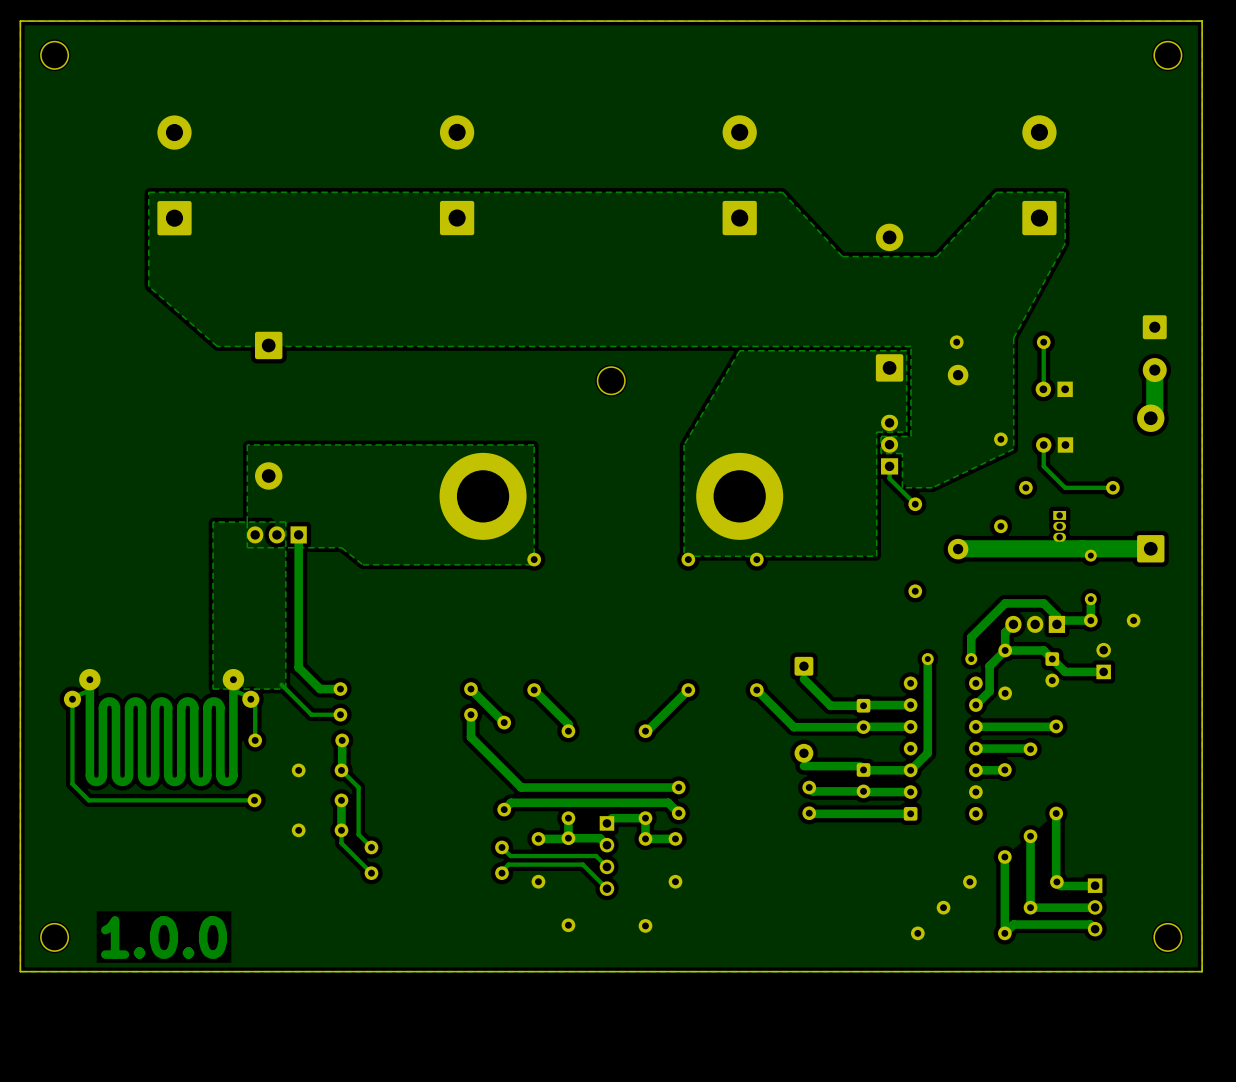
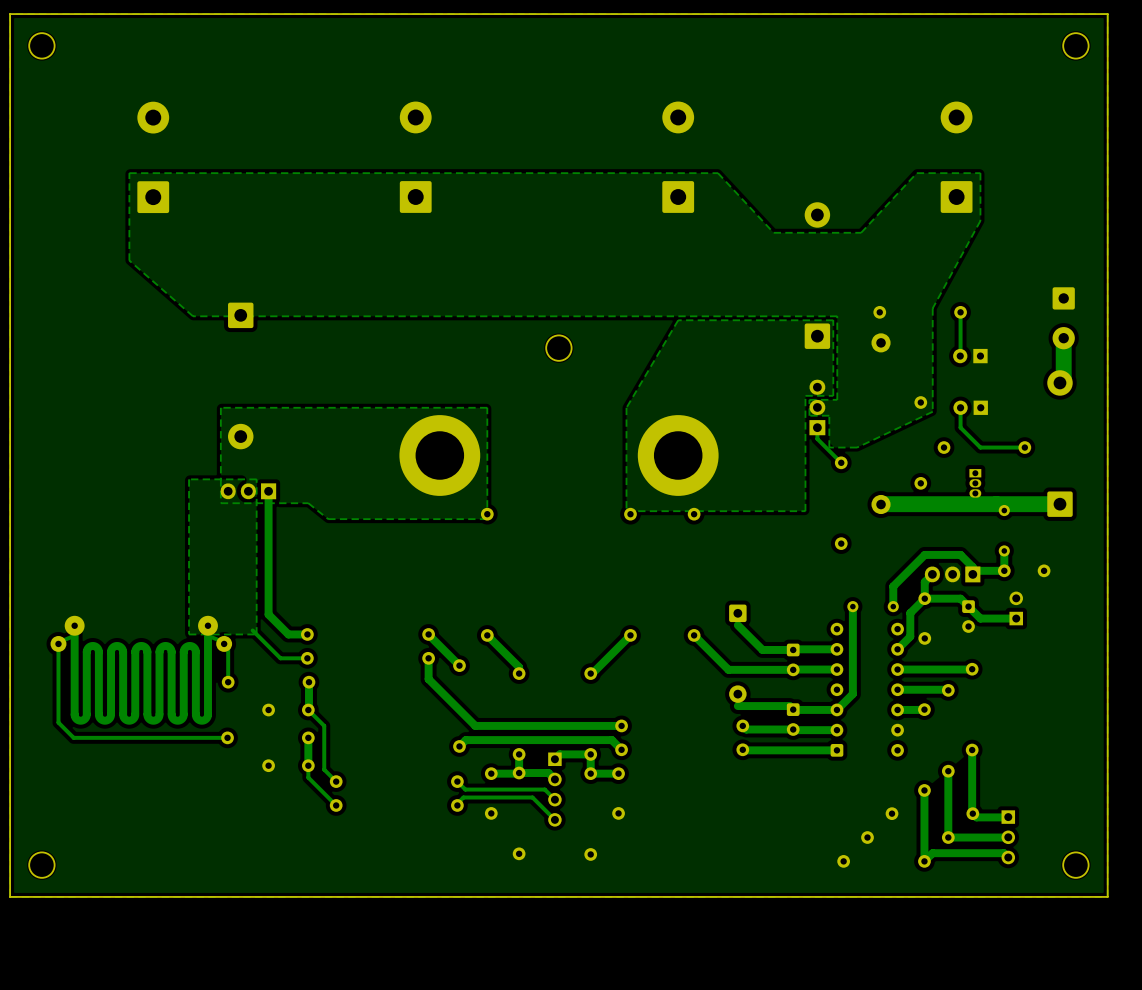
text: 1.0.0 (164, 937) -> none

